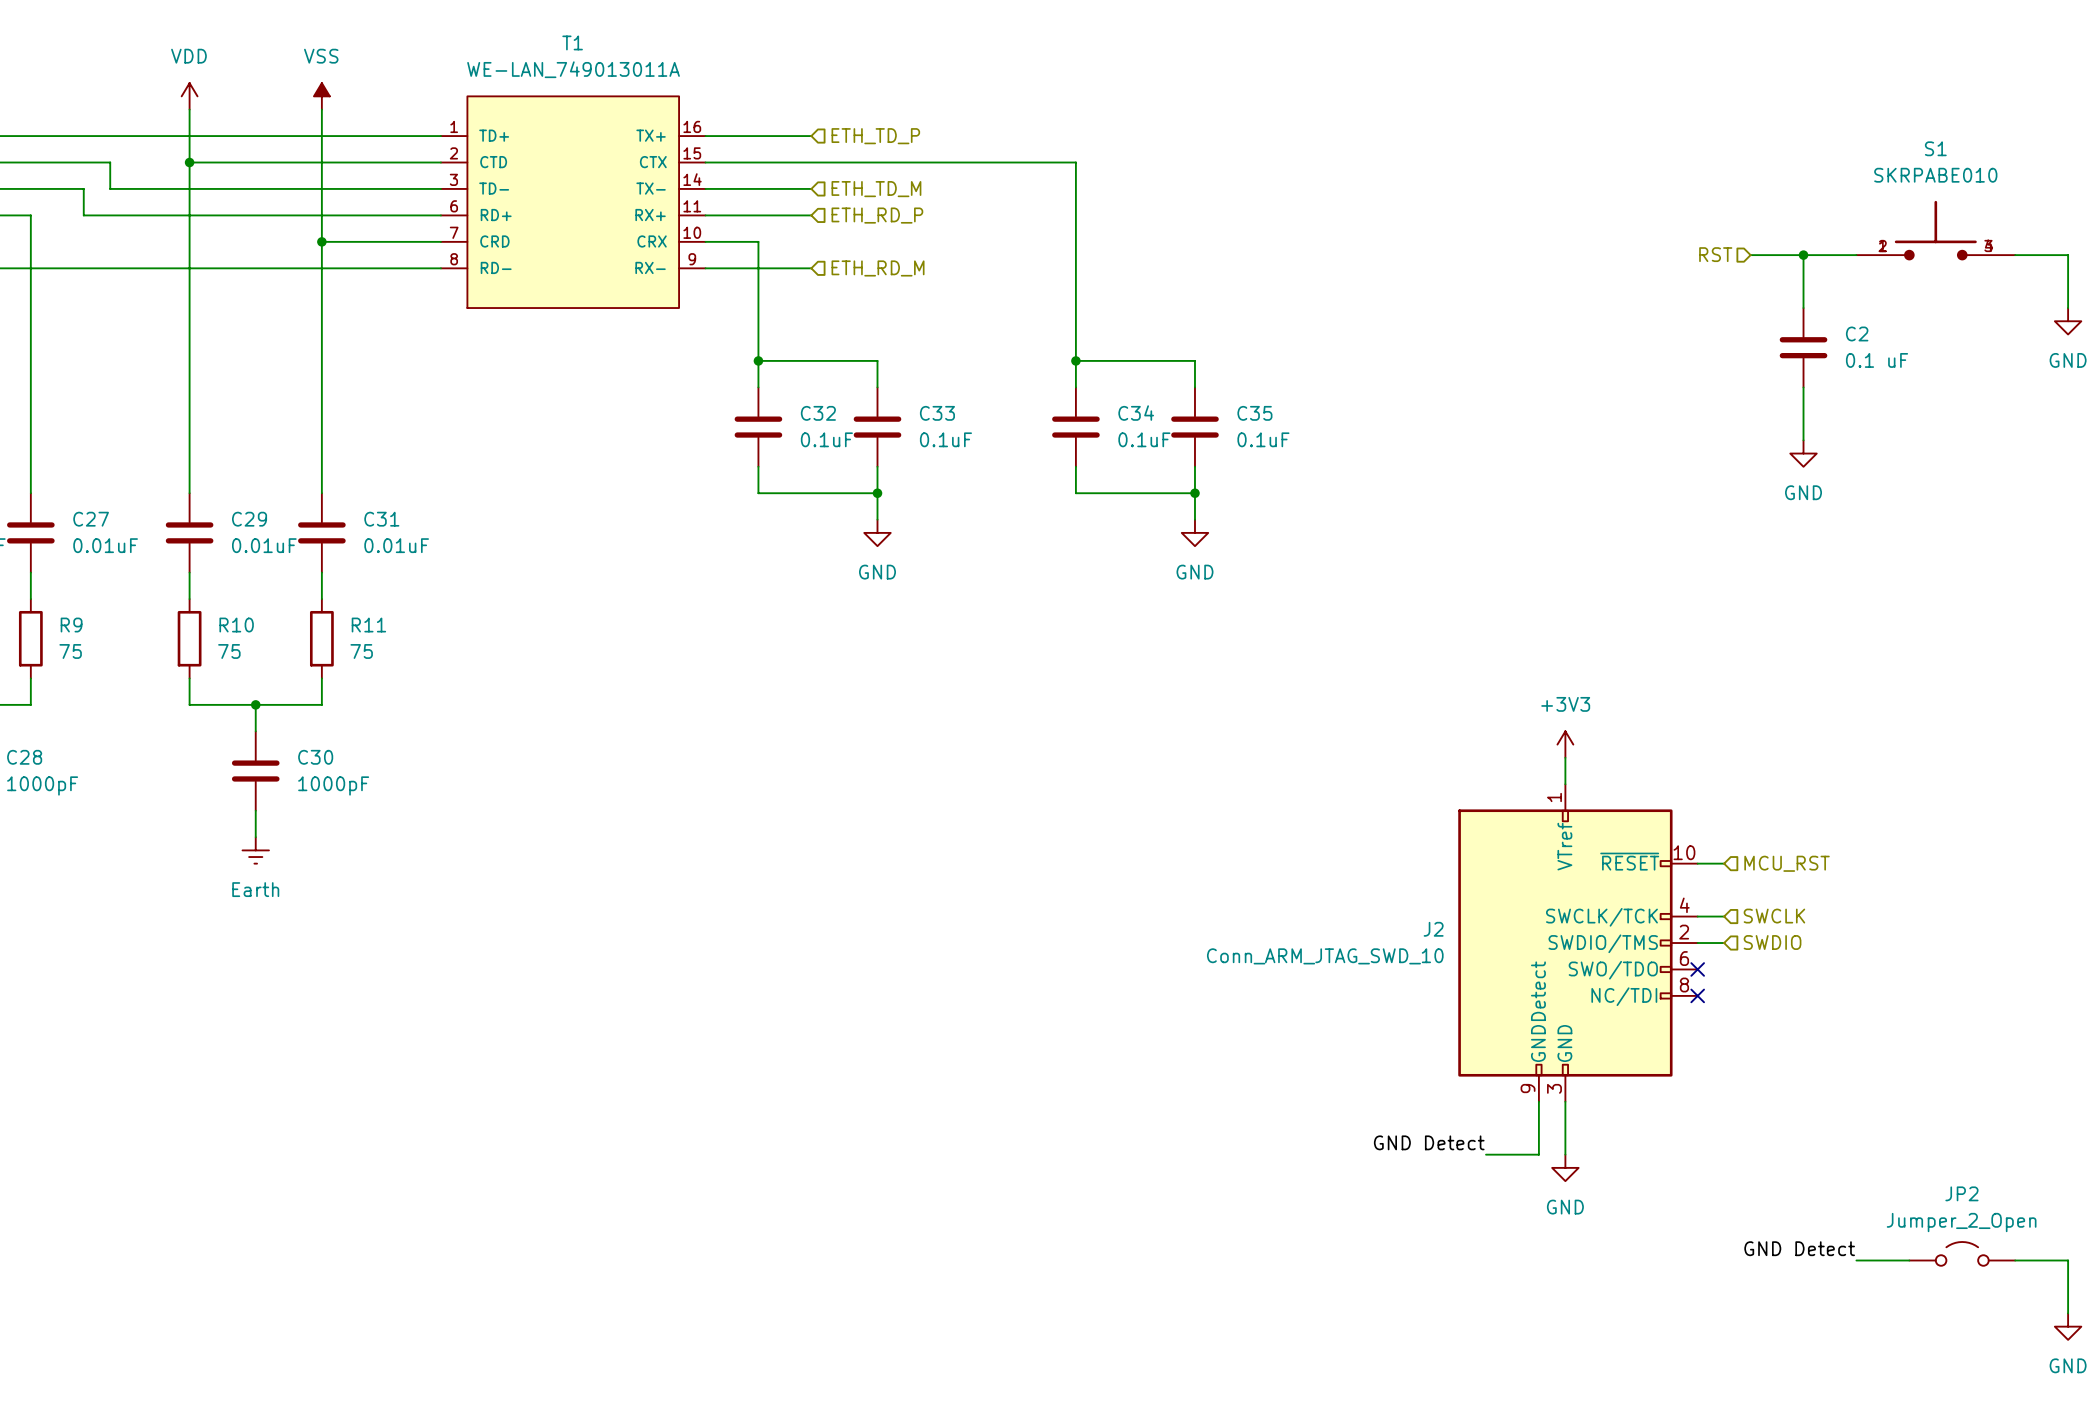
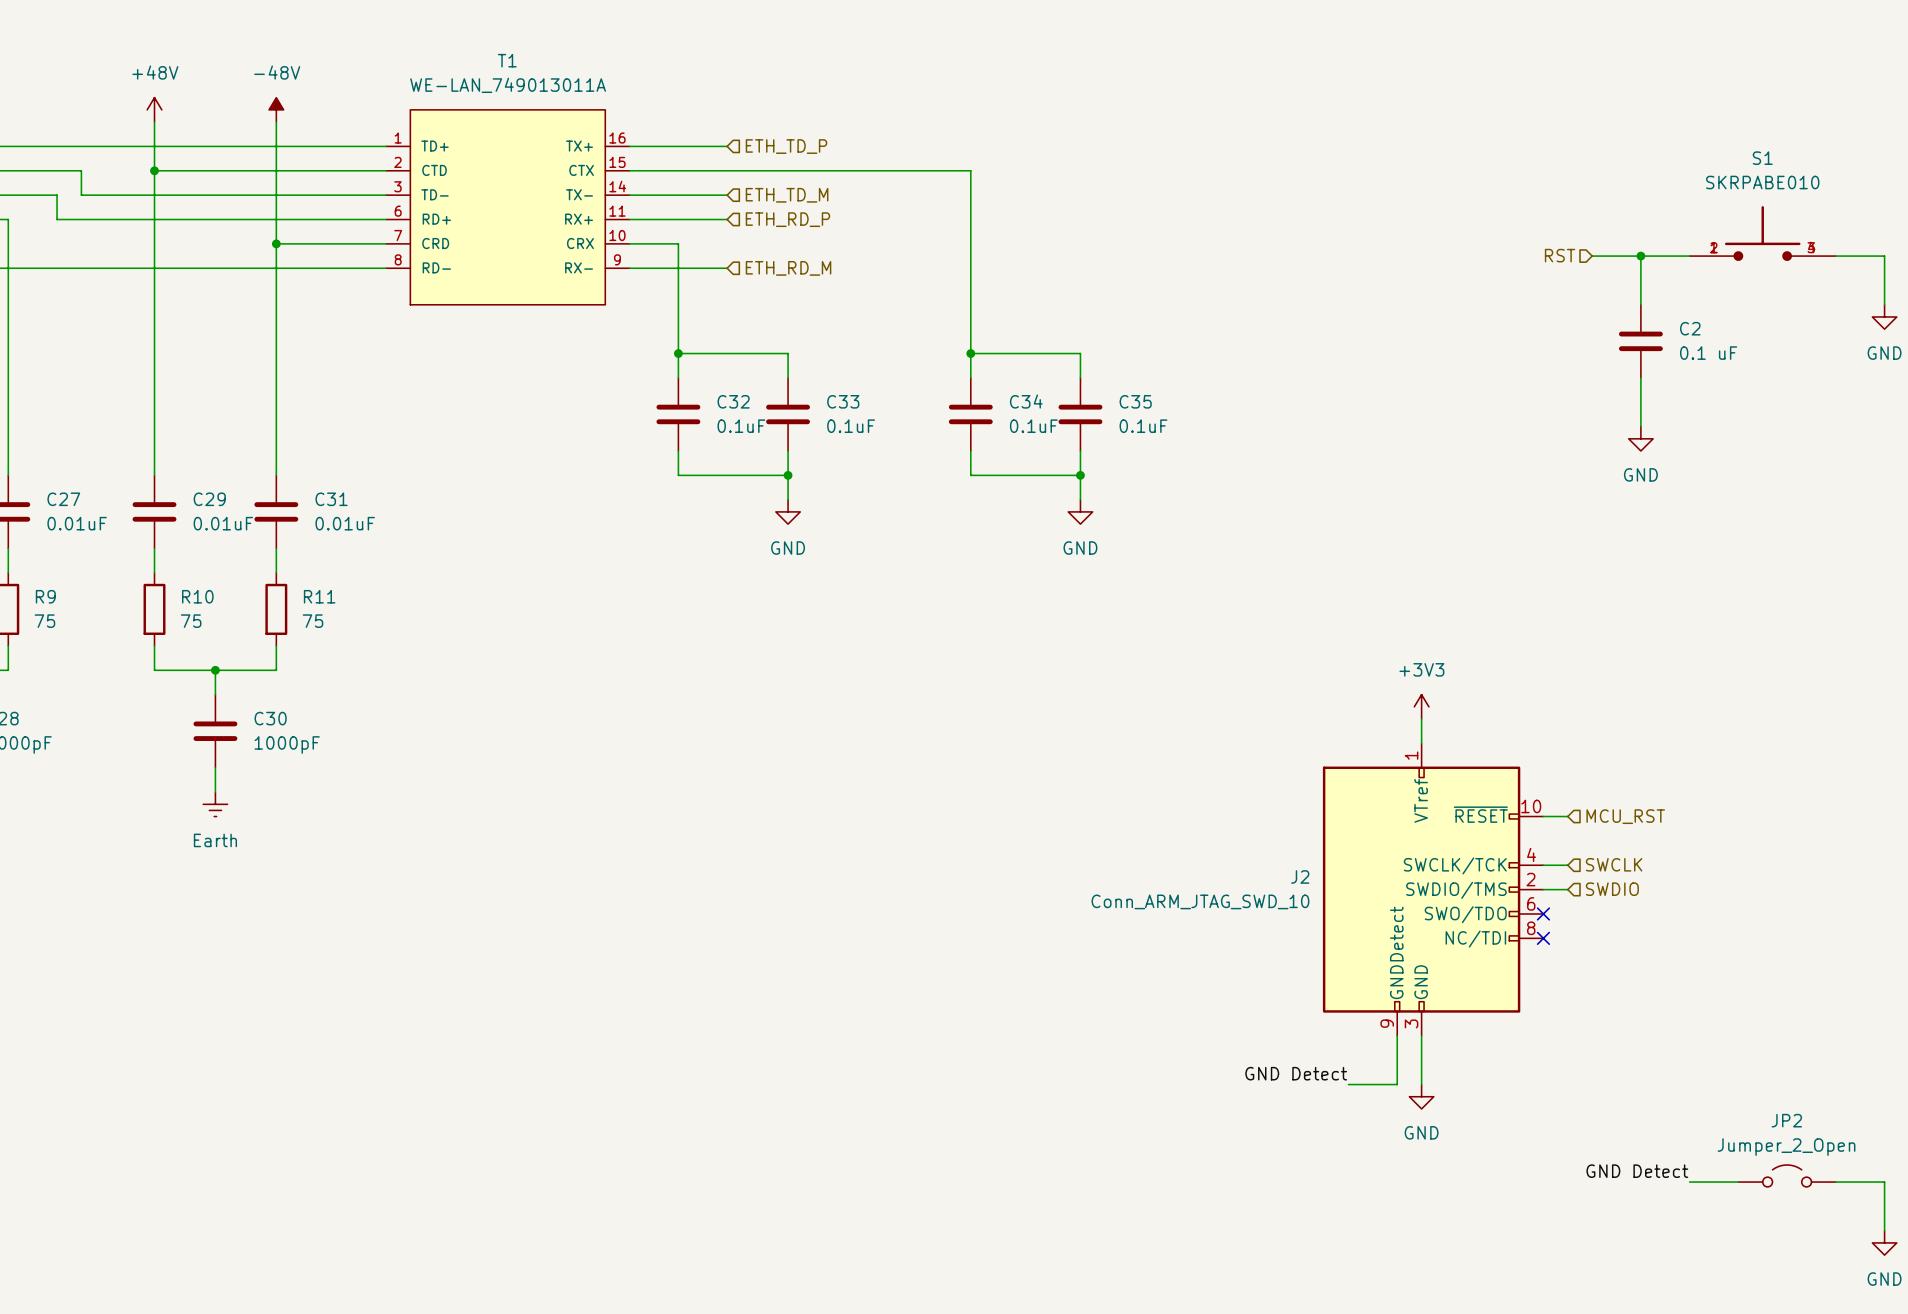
power symbol: VDD (189, 96) -> +48V (154, 109)
power symbol: VSS (321, 96) -> -48V (276, 109)

